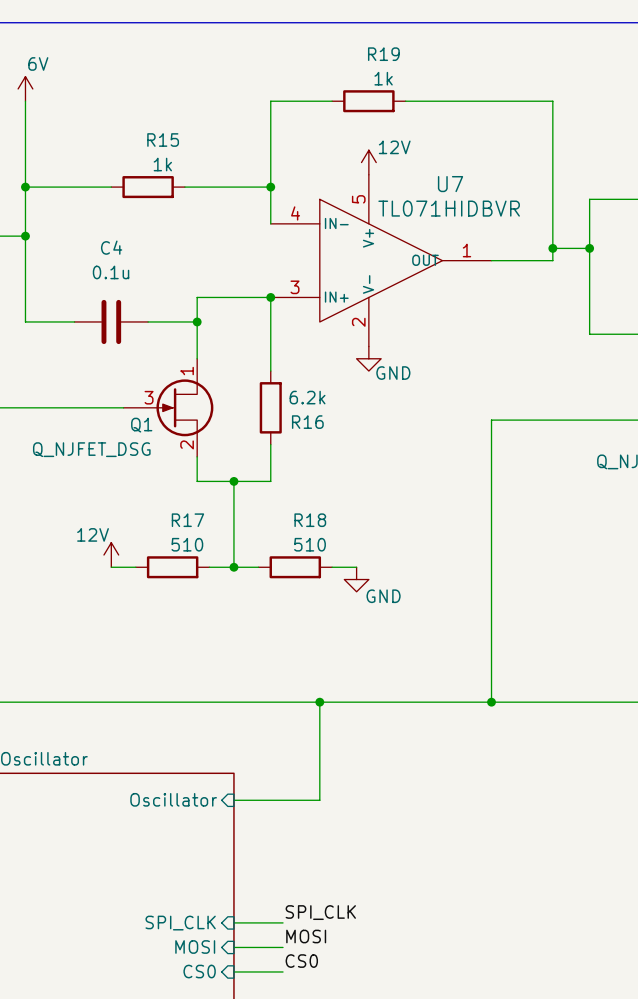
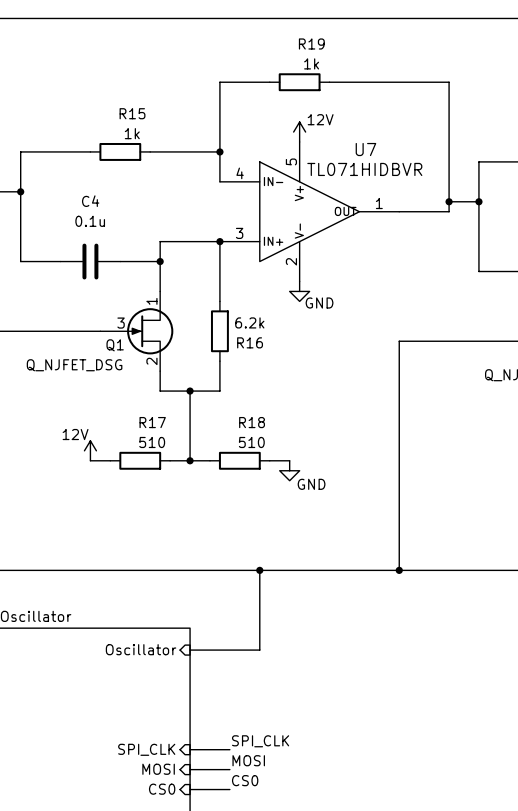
power symbol: 6V (25, 88) -> none
wire: (25, 101) (25, 187) -> none
junction: (25, 187) -> none

